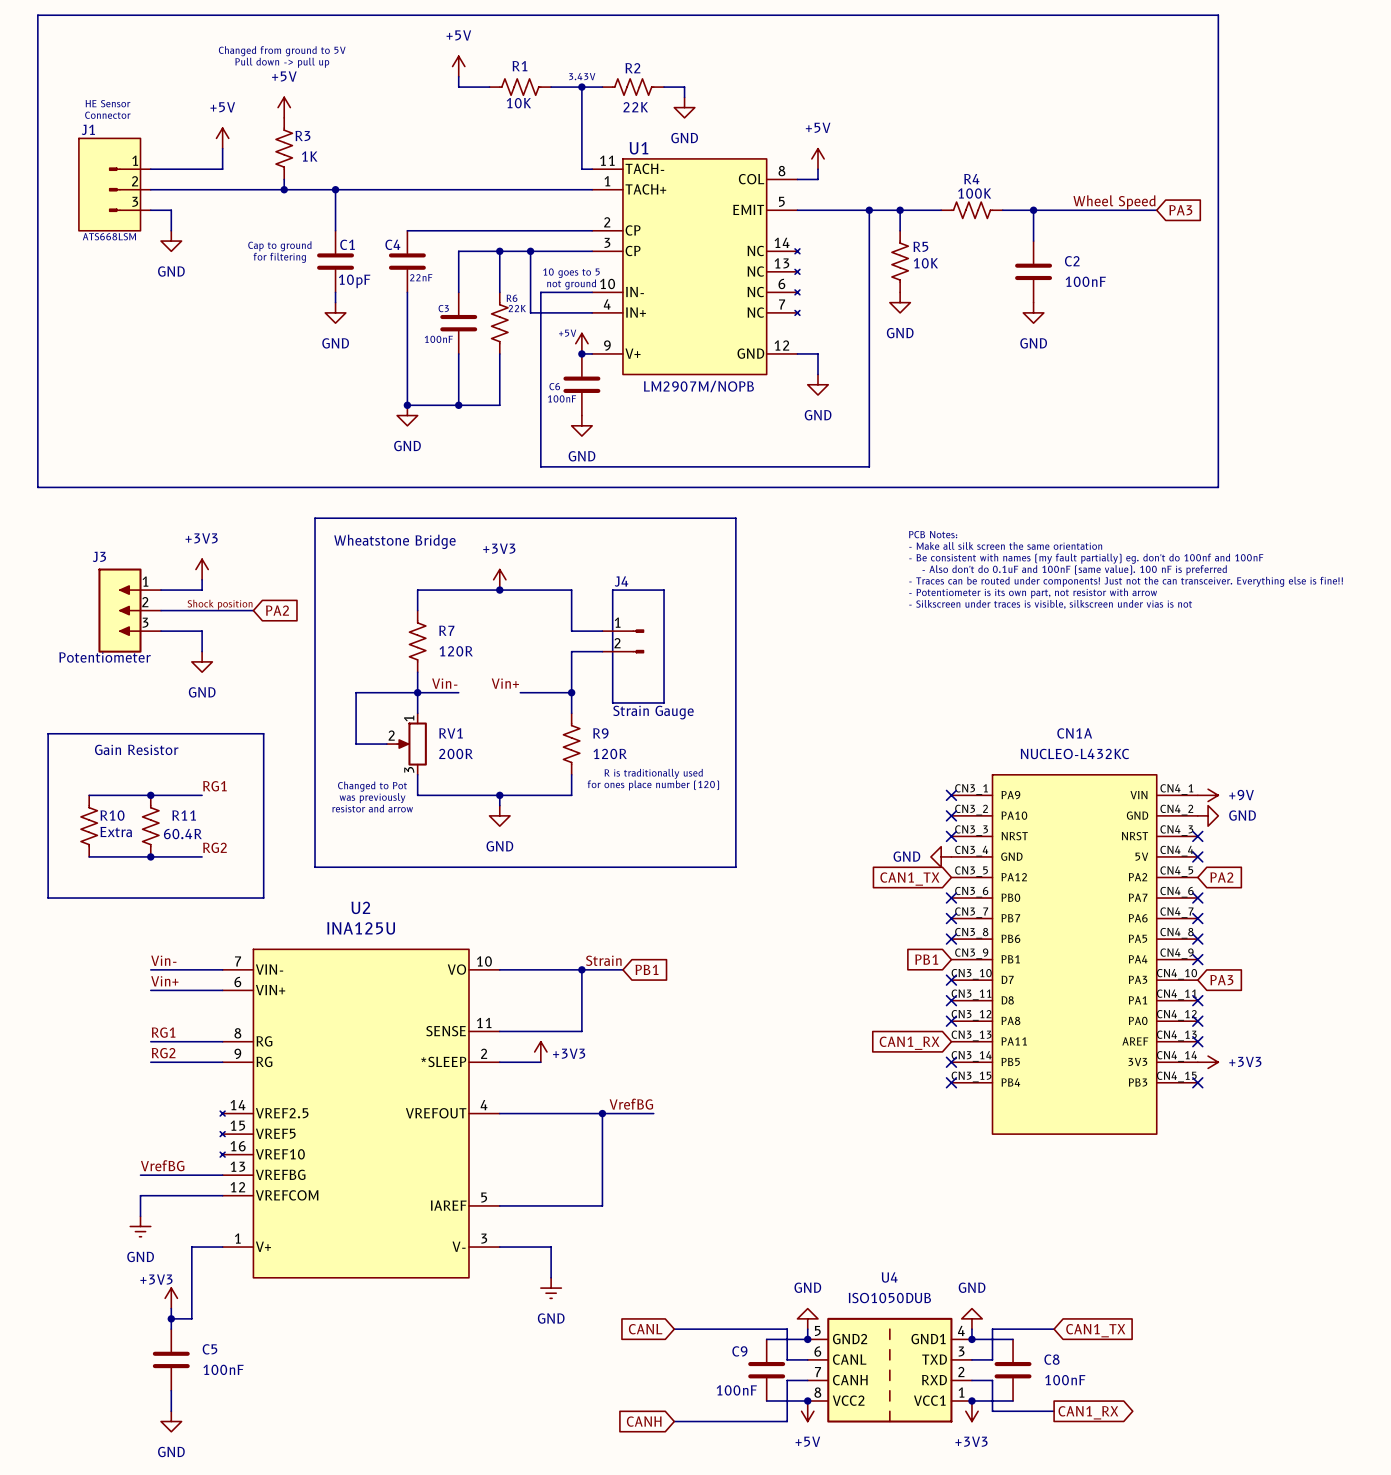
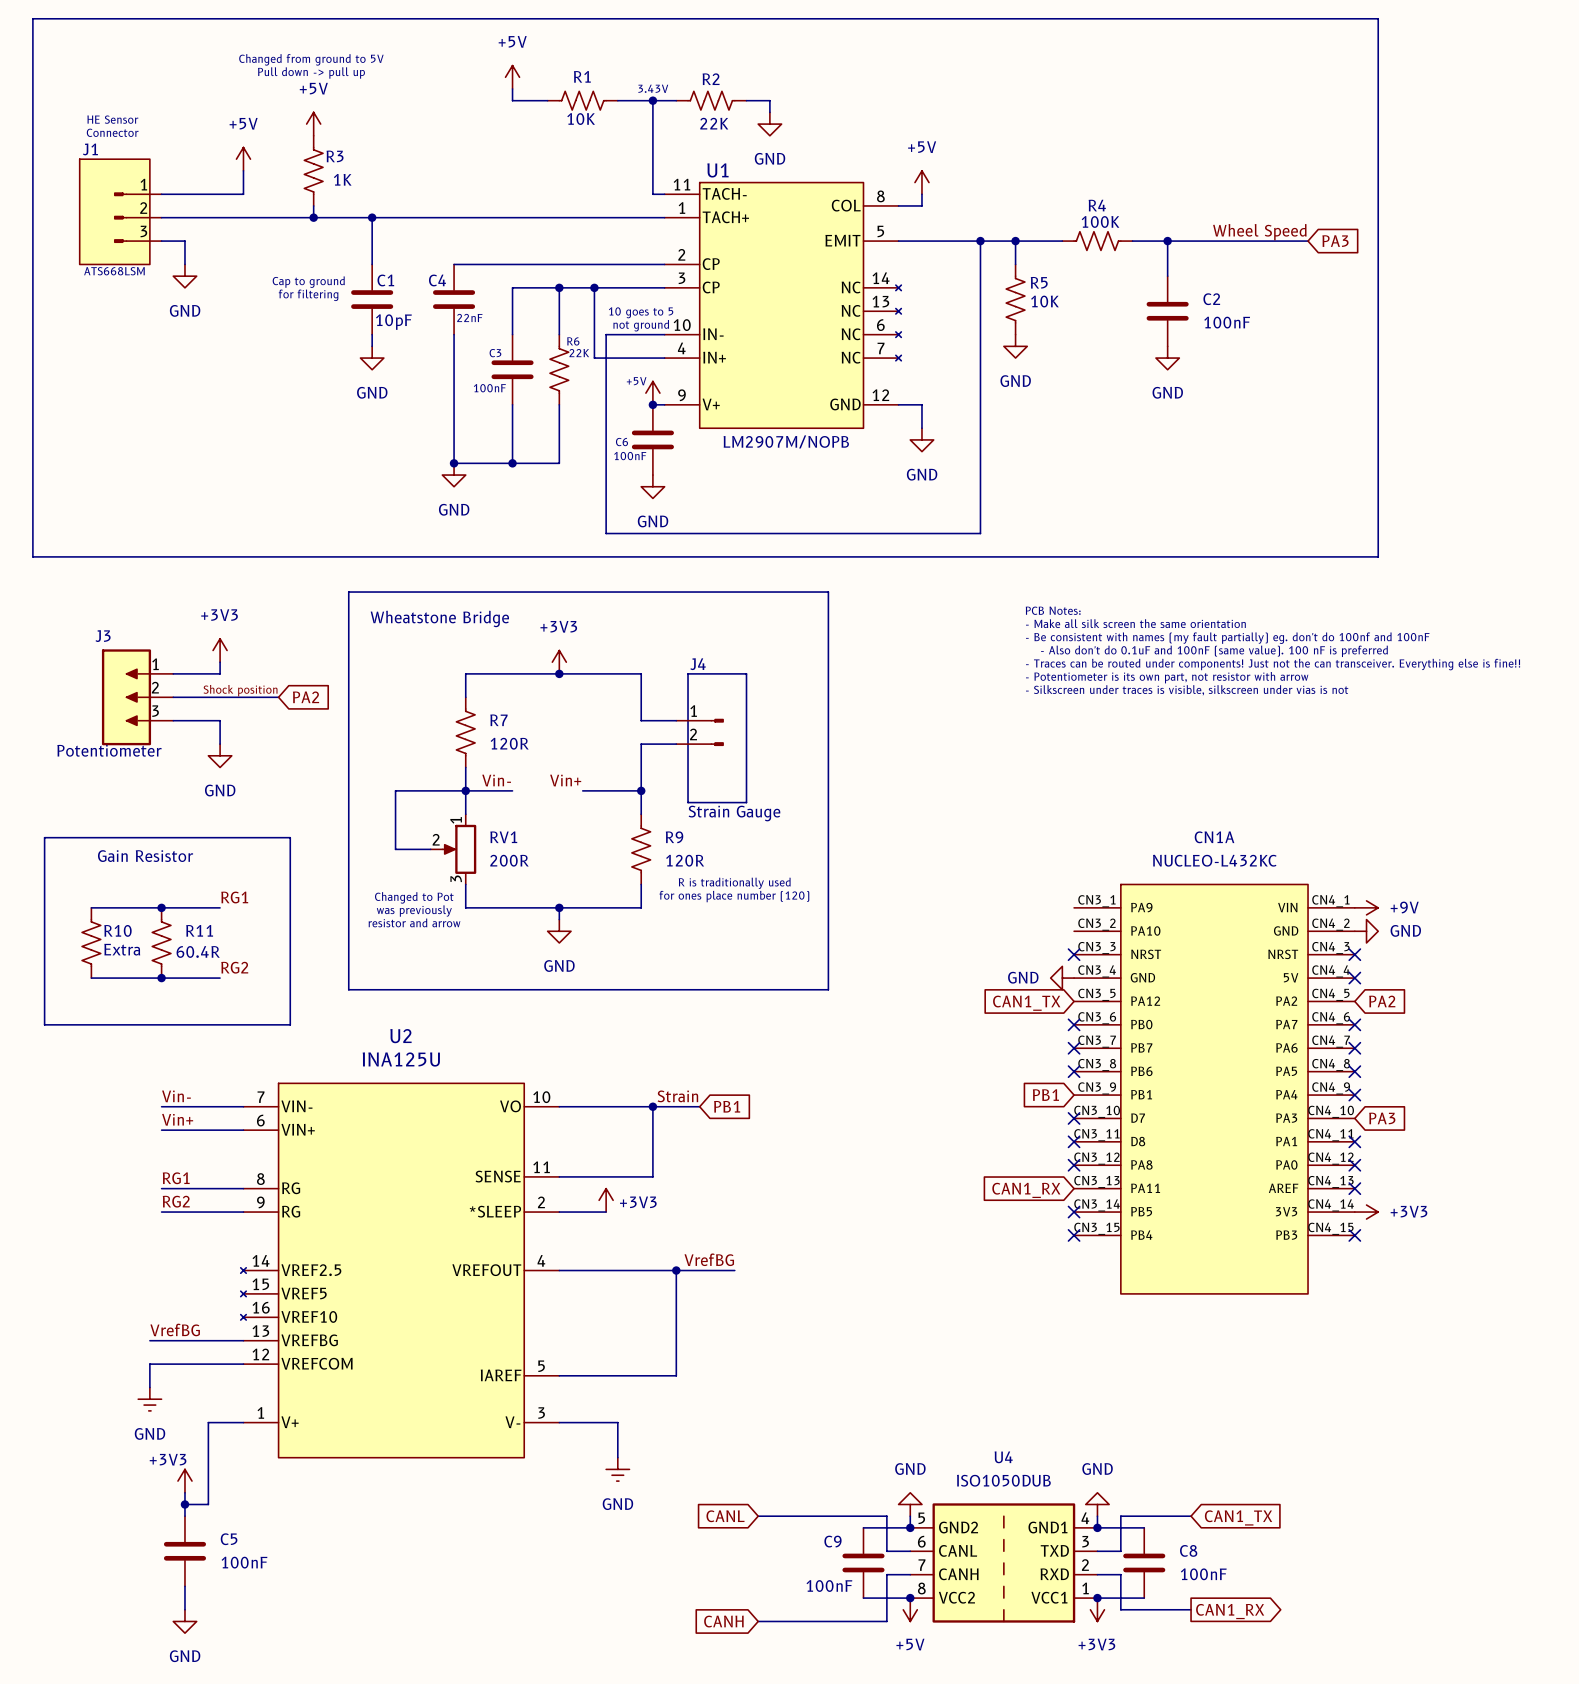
no-connect mark: (951, 795) -> none
no-connect mark: (951, 815) -> none

